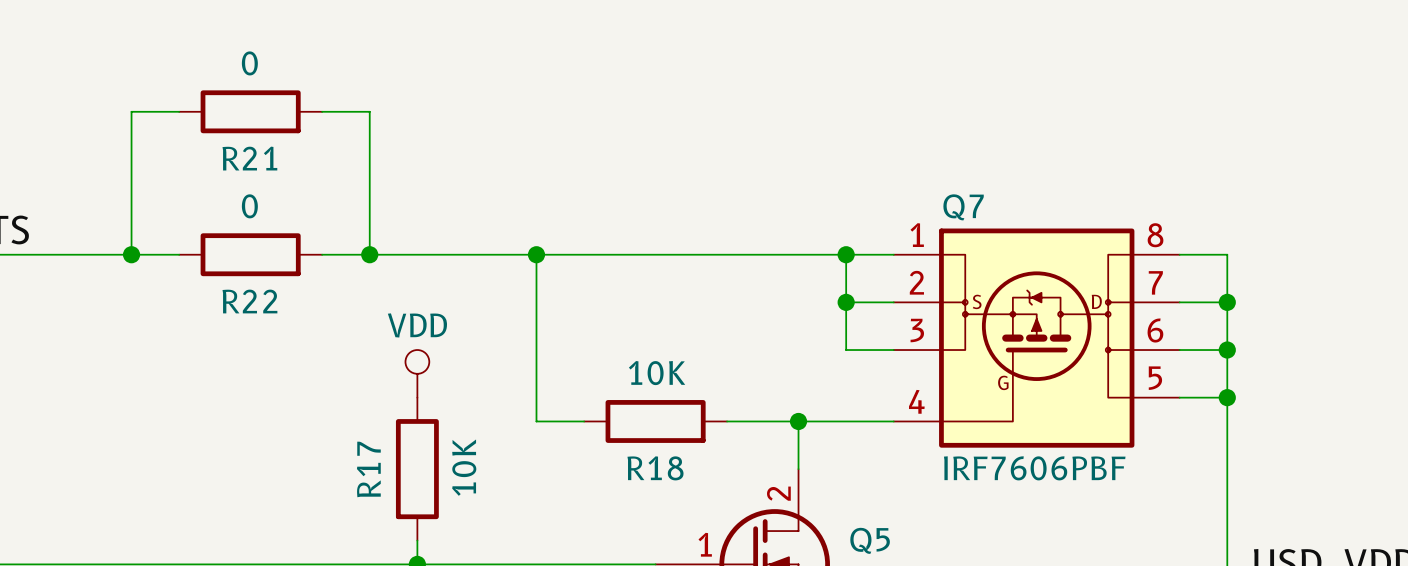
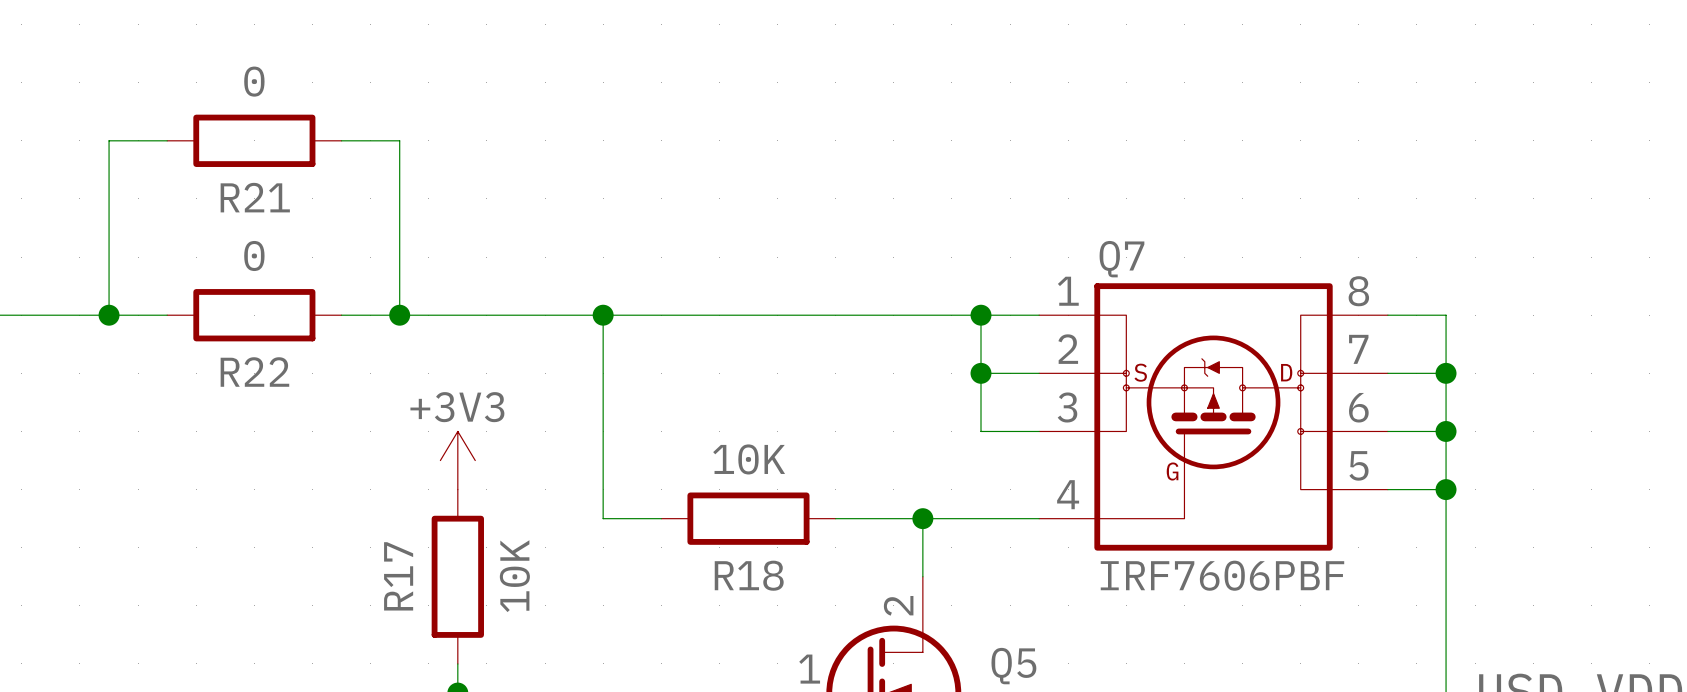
power symbol: VDD (417, 373) -> +3V3 (457, 460)

